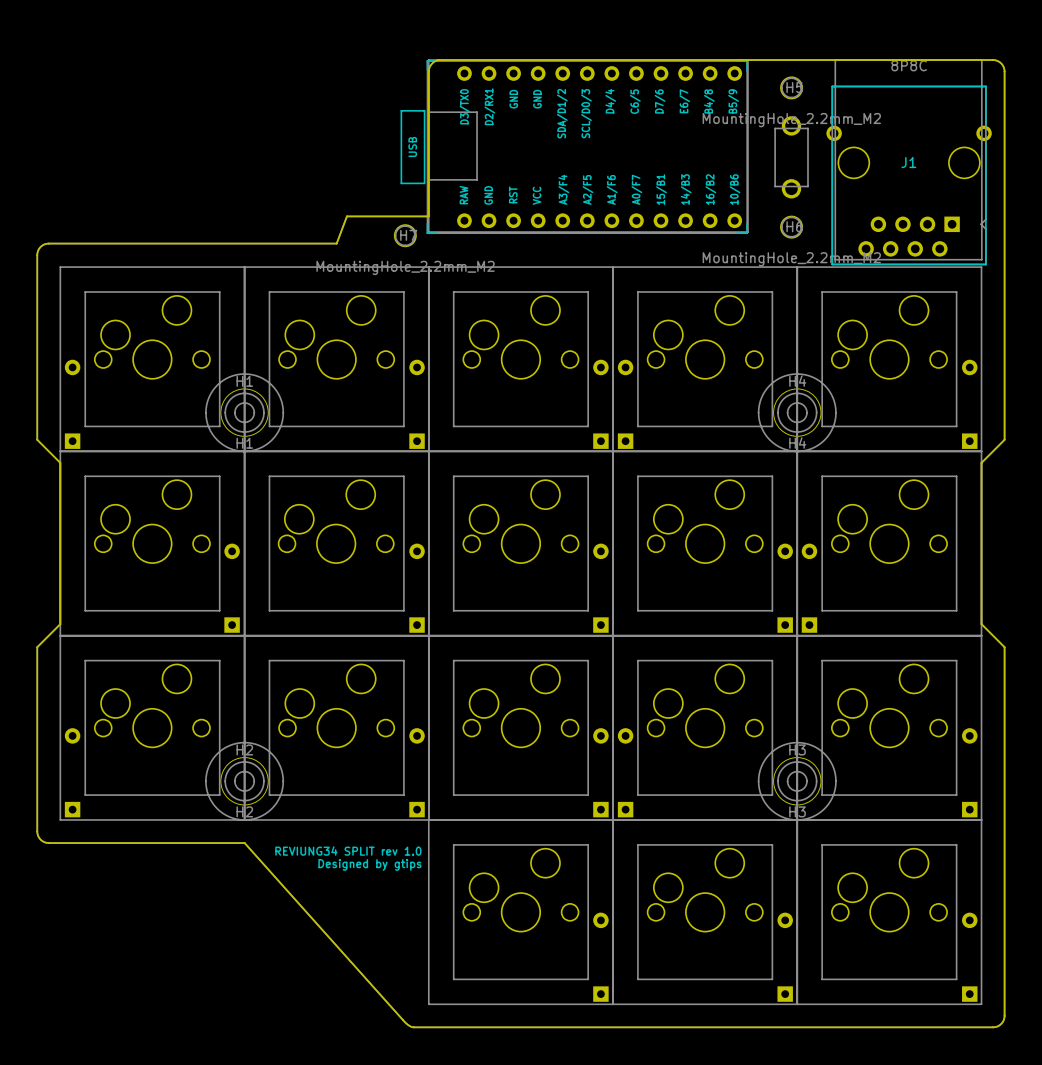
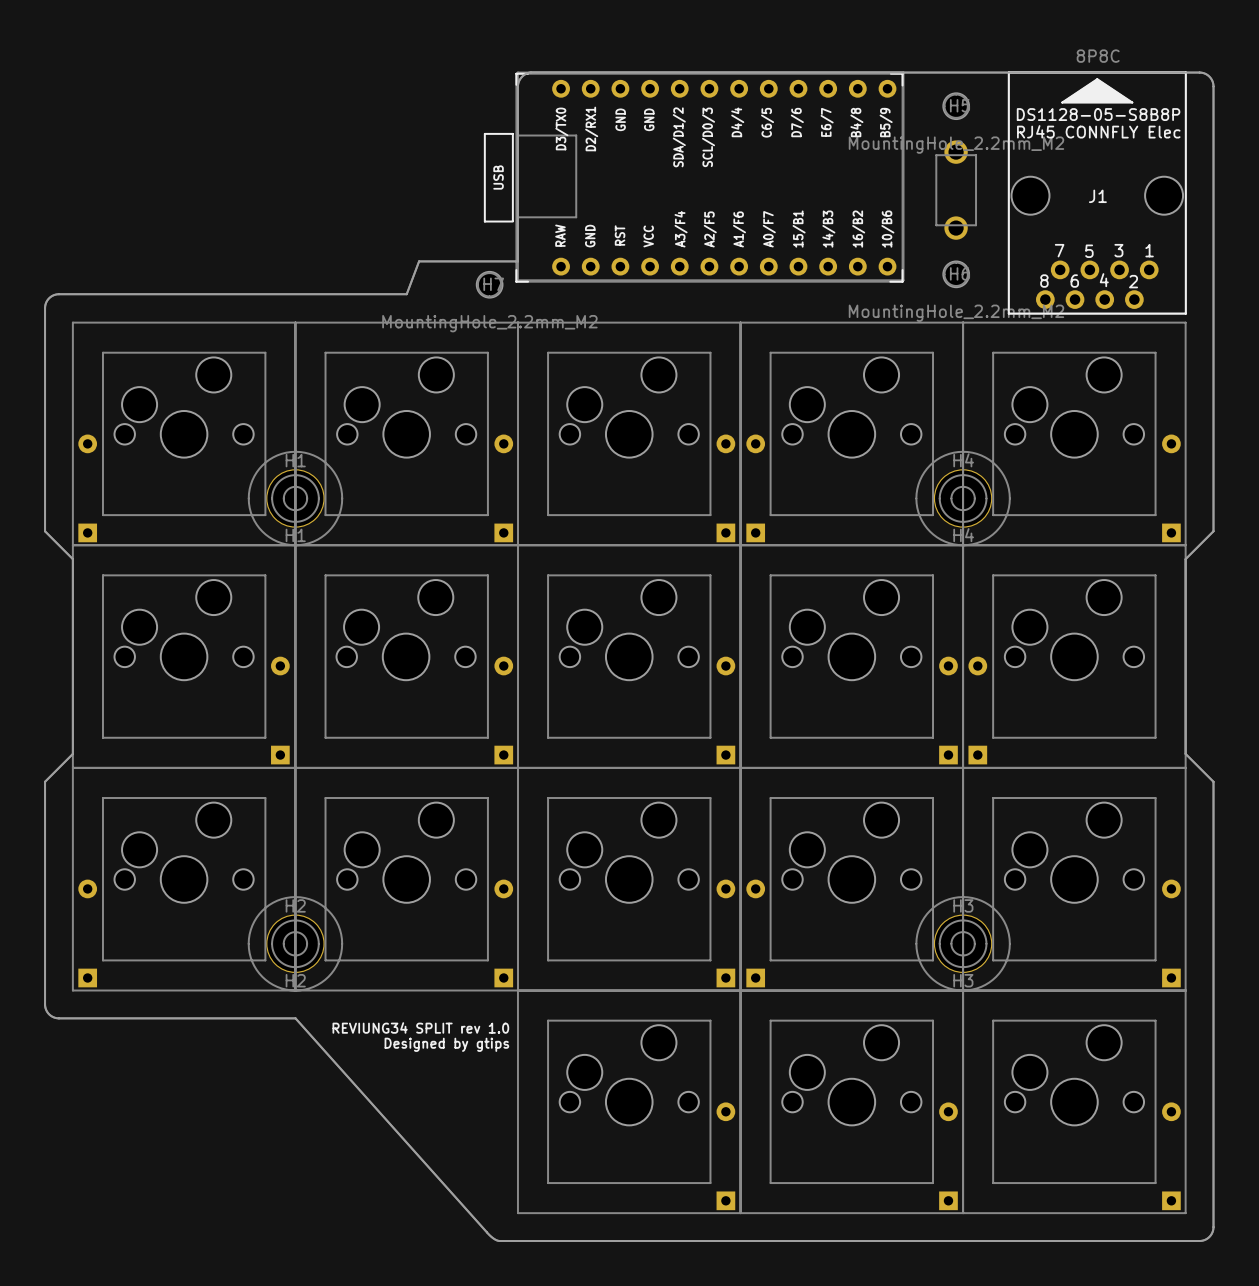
J1 footprint: [826, 85, 992, 266] -> [1008, 71, 1187, 315]

